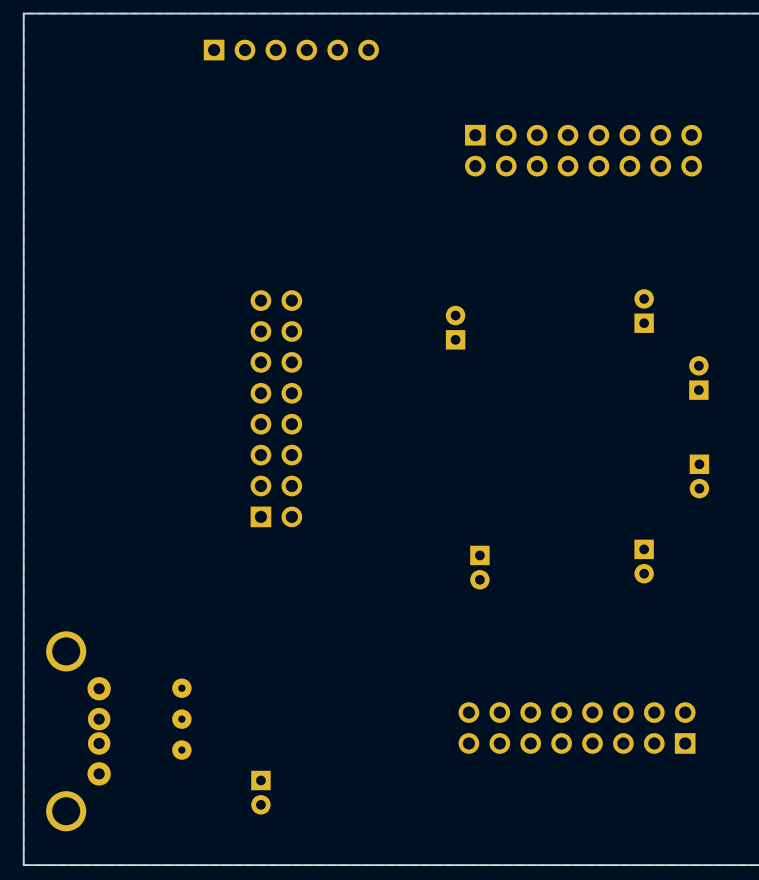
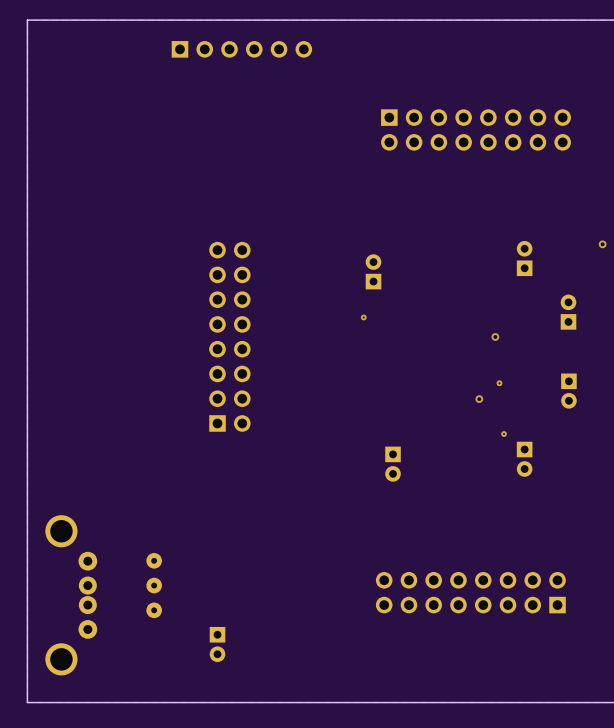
via: none -> (602, 244)
via: none -> (363, 317)
via: none -> (495, 336)
via: none -> (499, 383)
via: none -> (479, 399)
via: none -> (504, 434)

